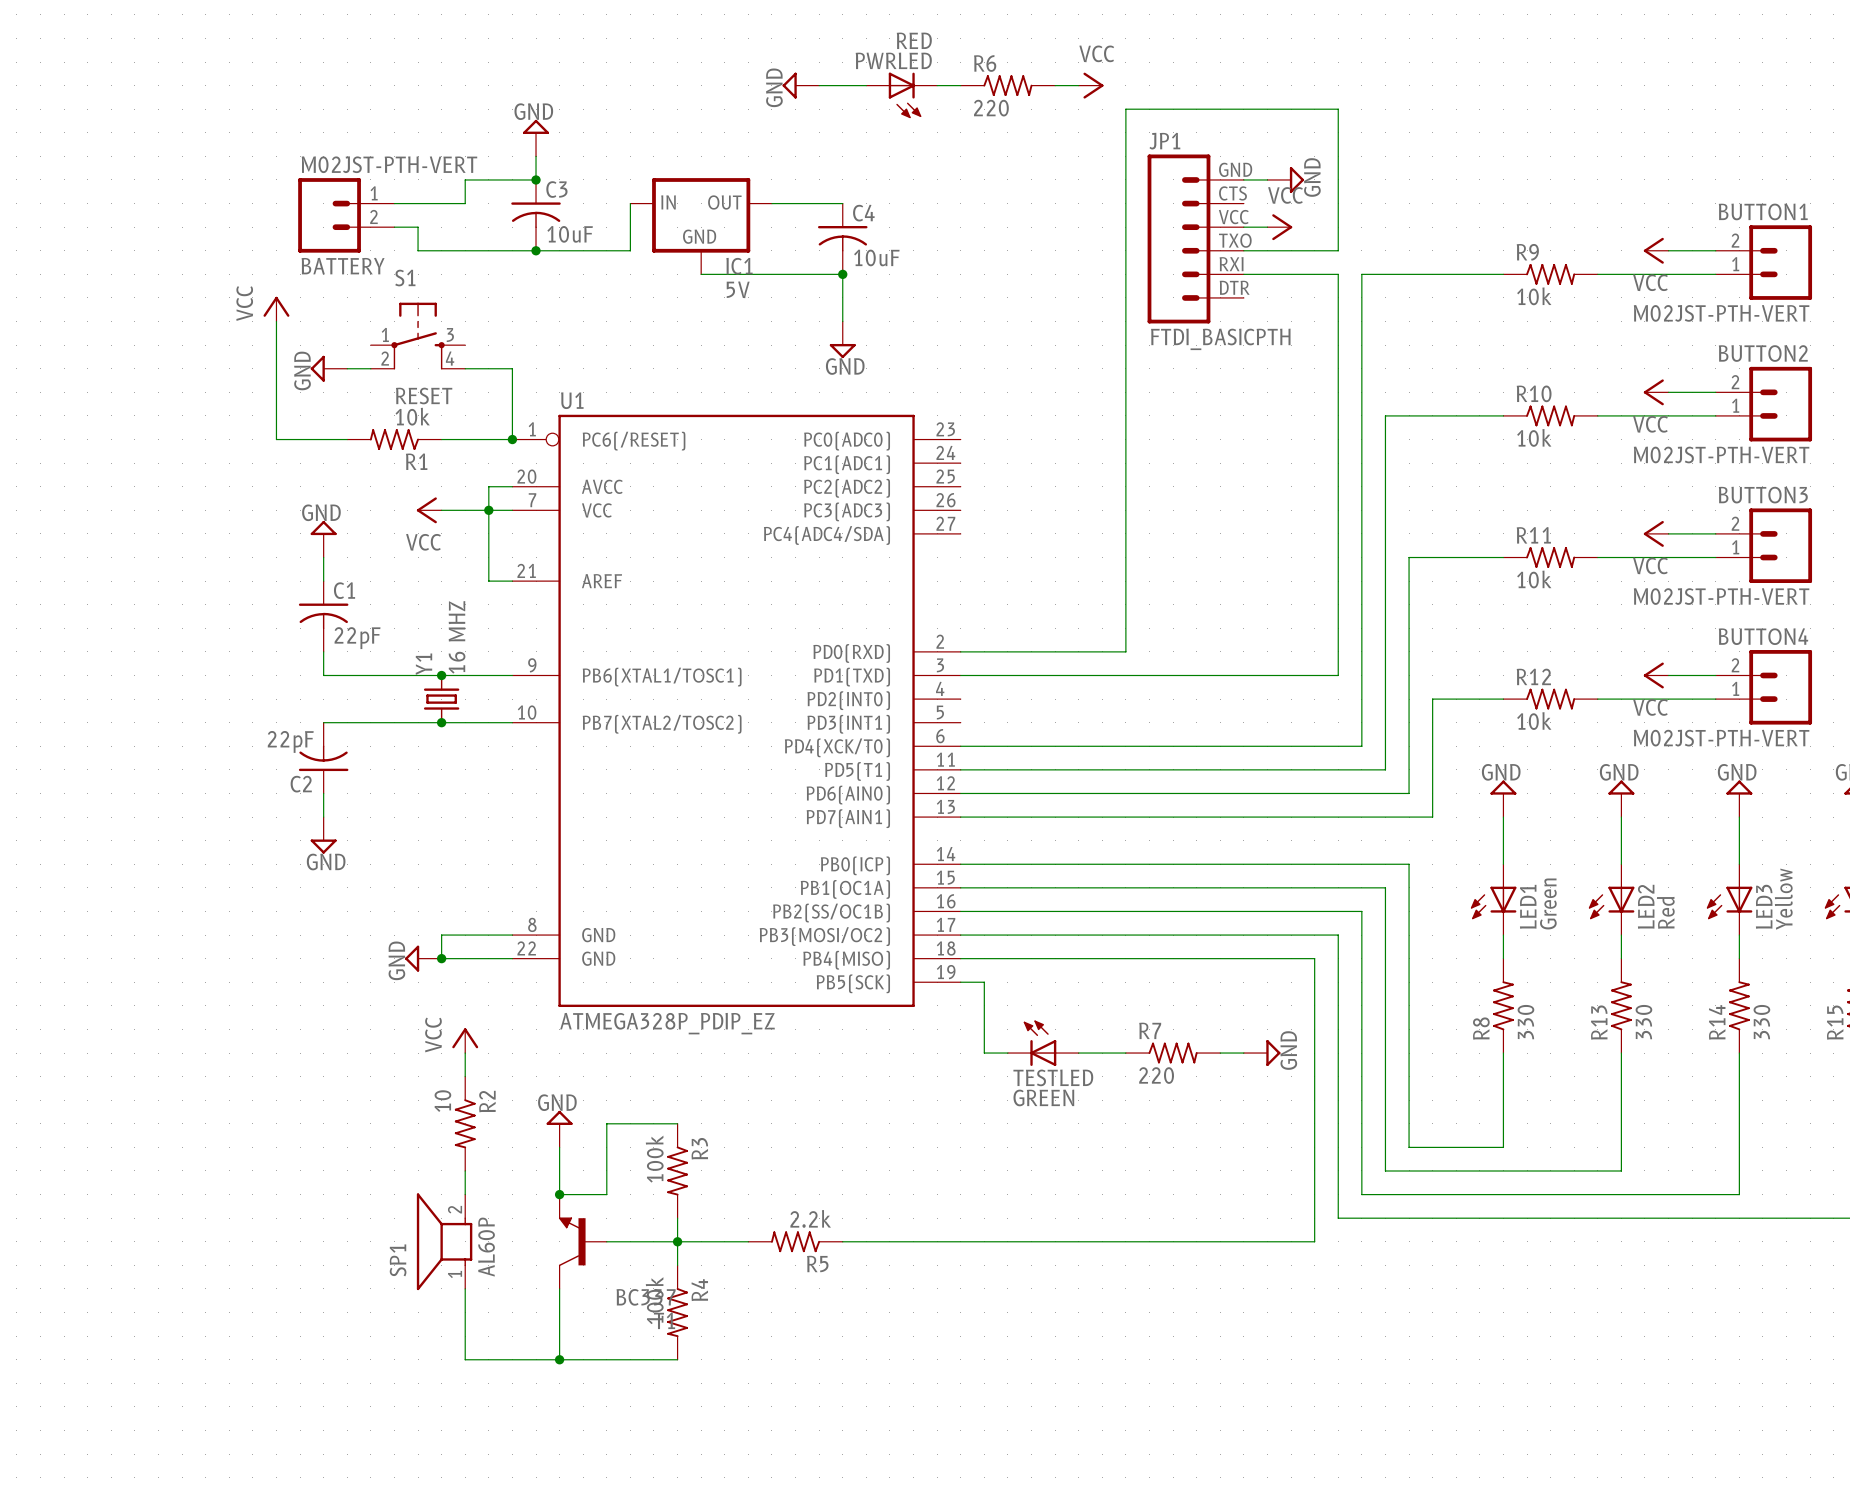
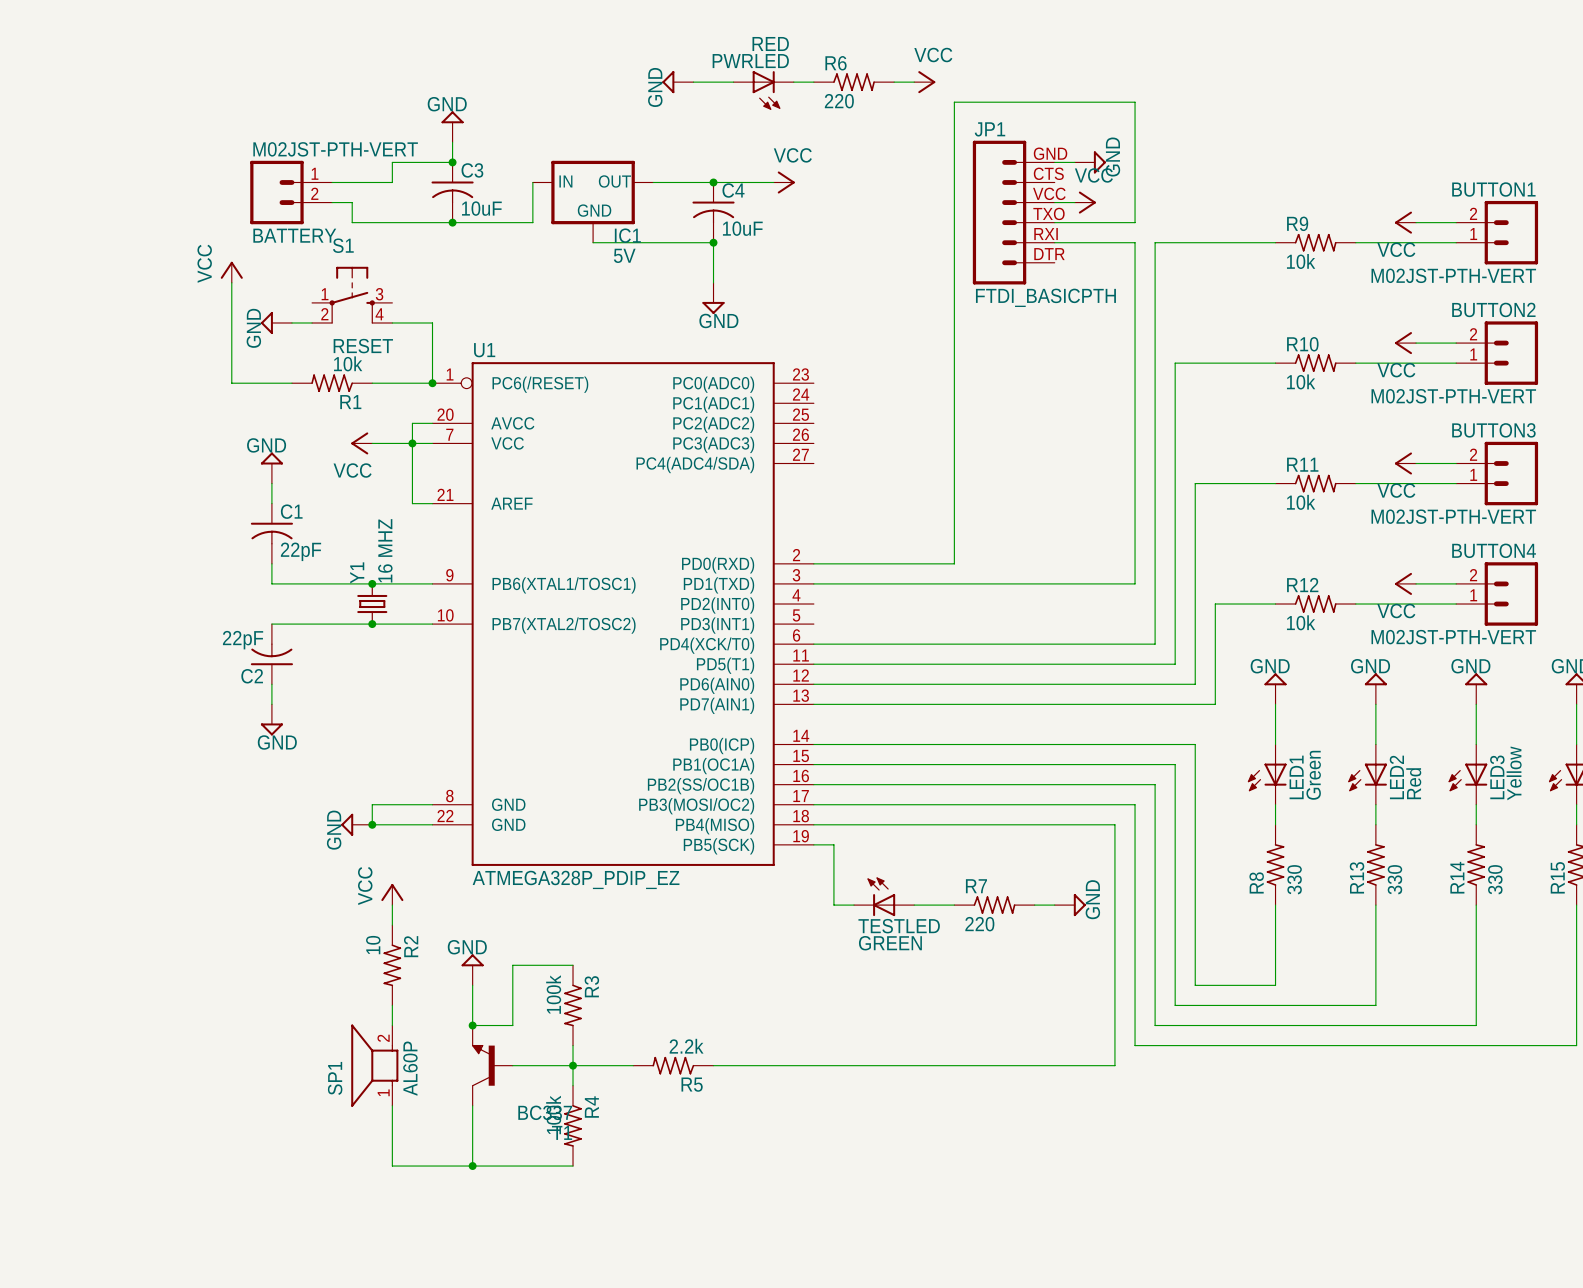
wire: none -> (713, 182) (773, 182)
junction: none -> (713, 182)
power symbol: none -> VCC (784, 182)

